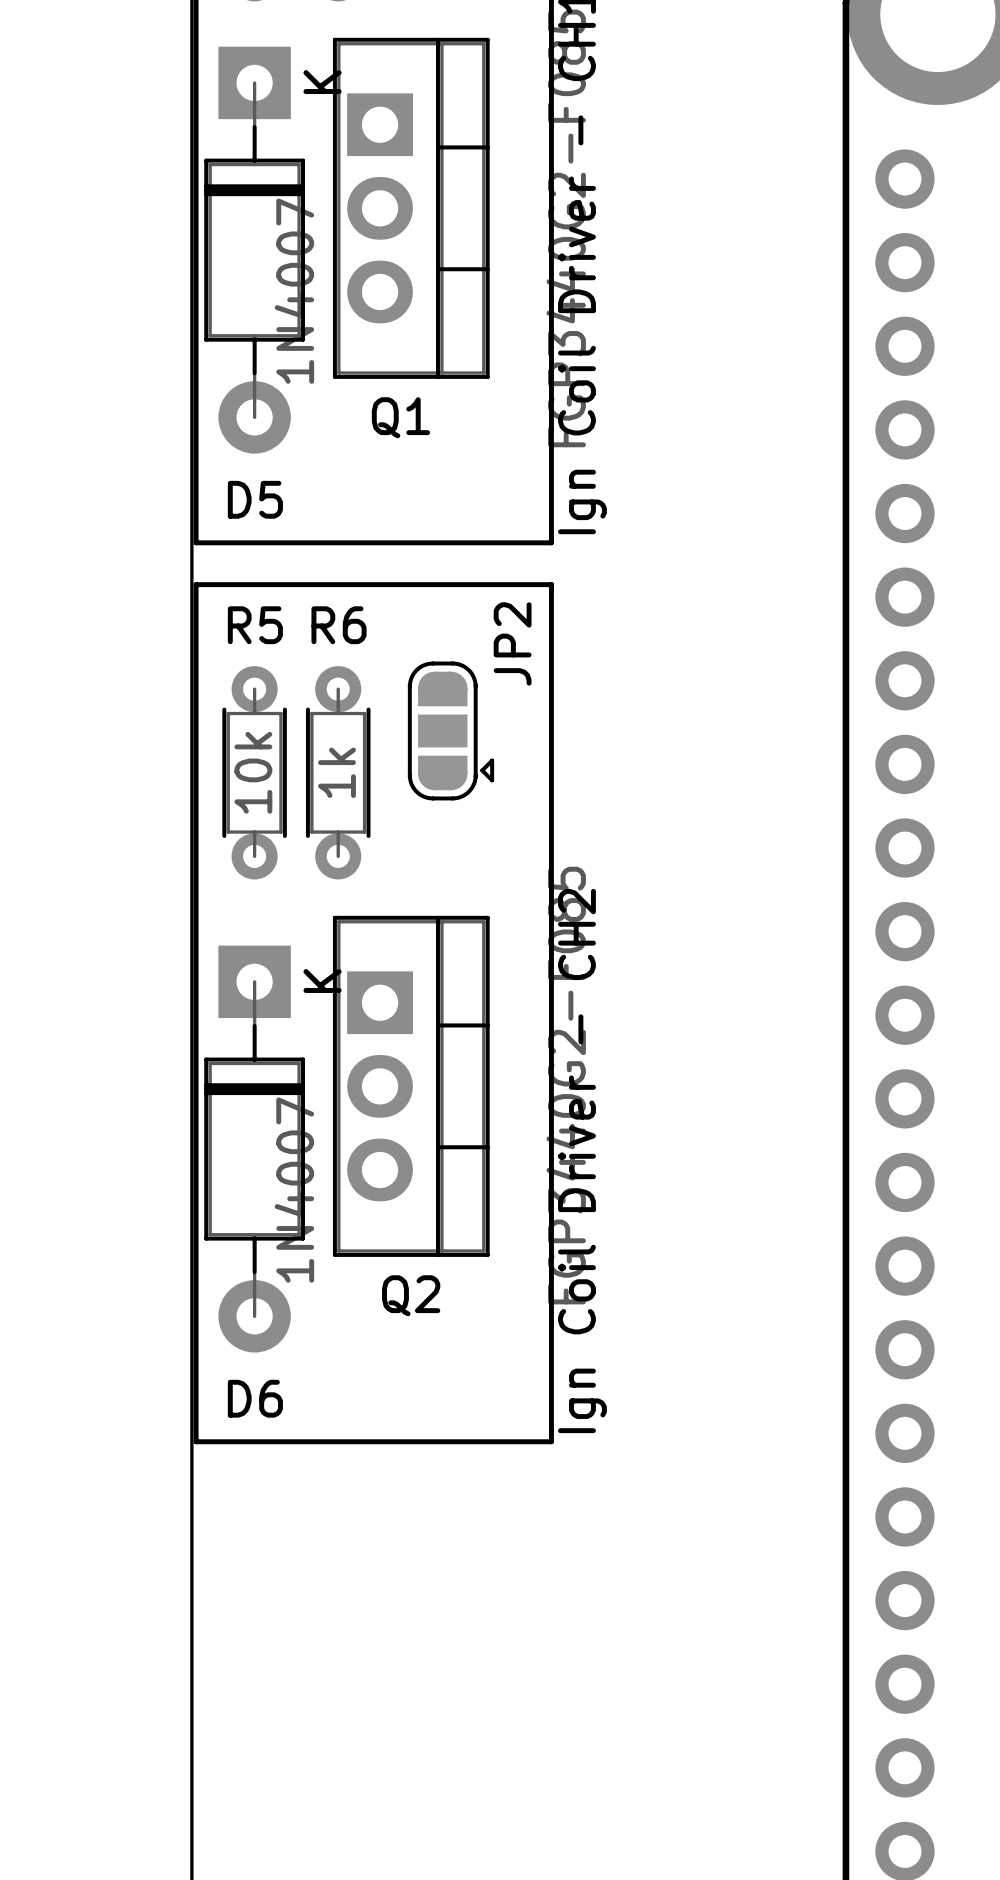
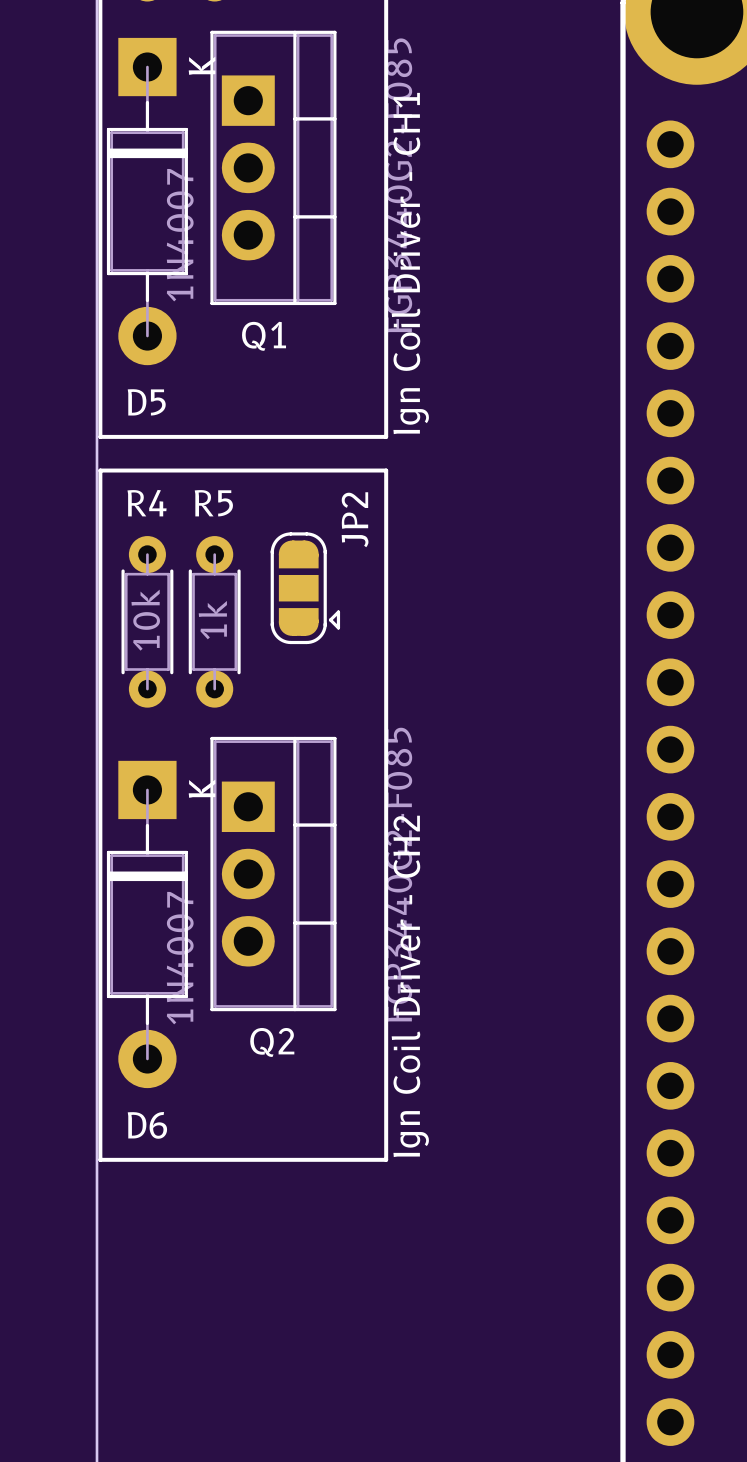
R5 name: R5 (255, 625) -> R4 (147, 503)
R6 name: R6 (339, 625) -> R5 (213, 503)

